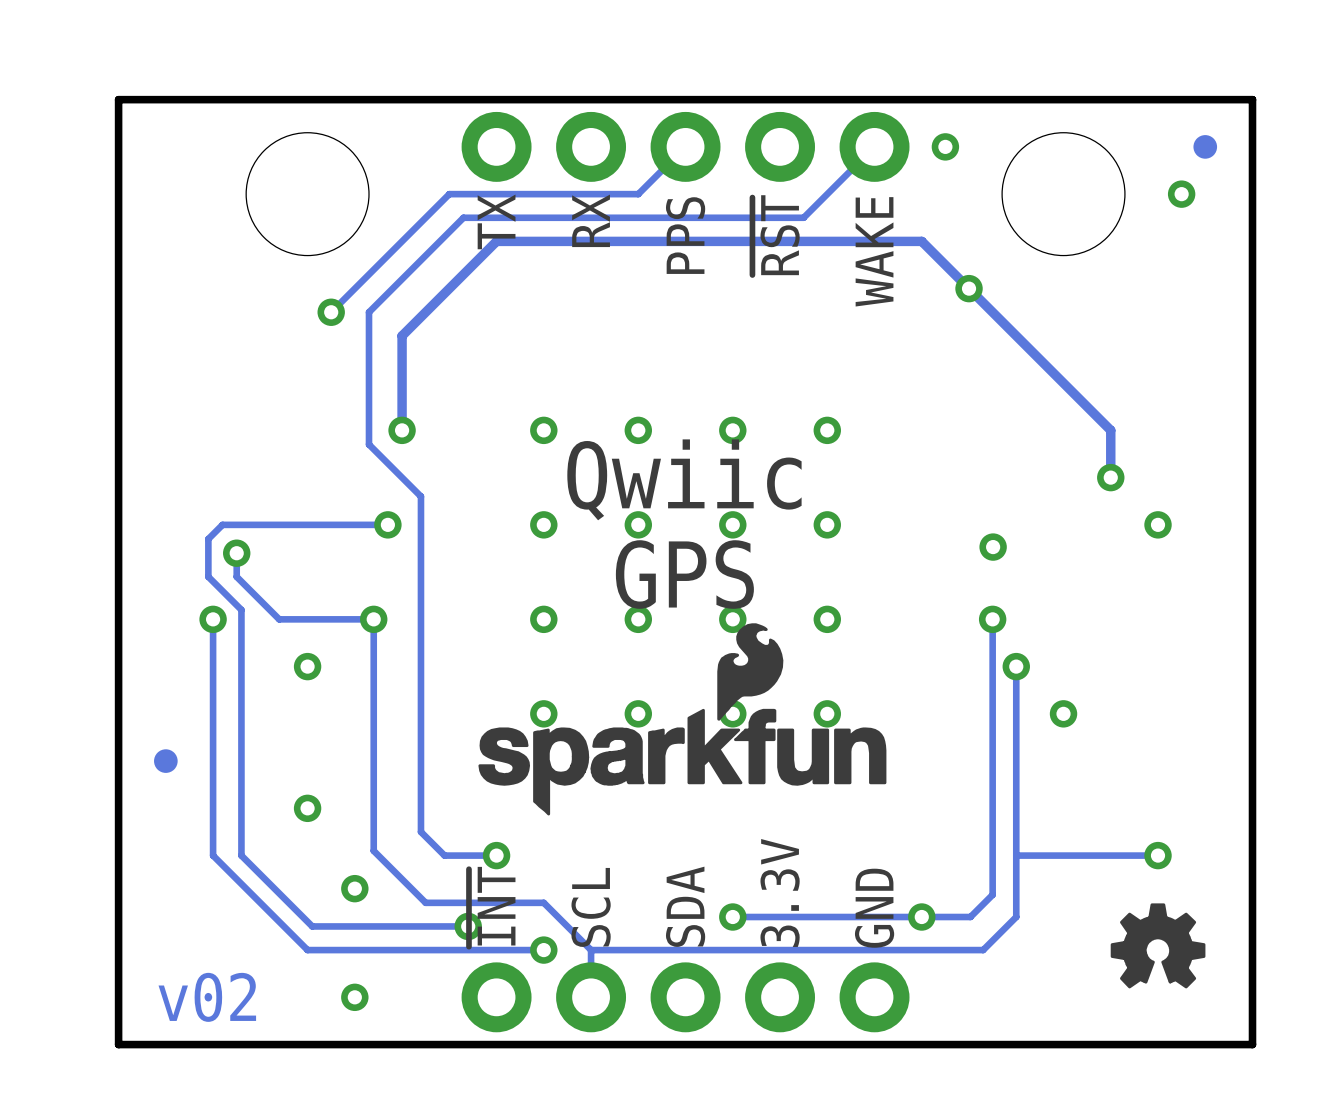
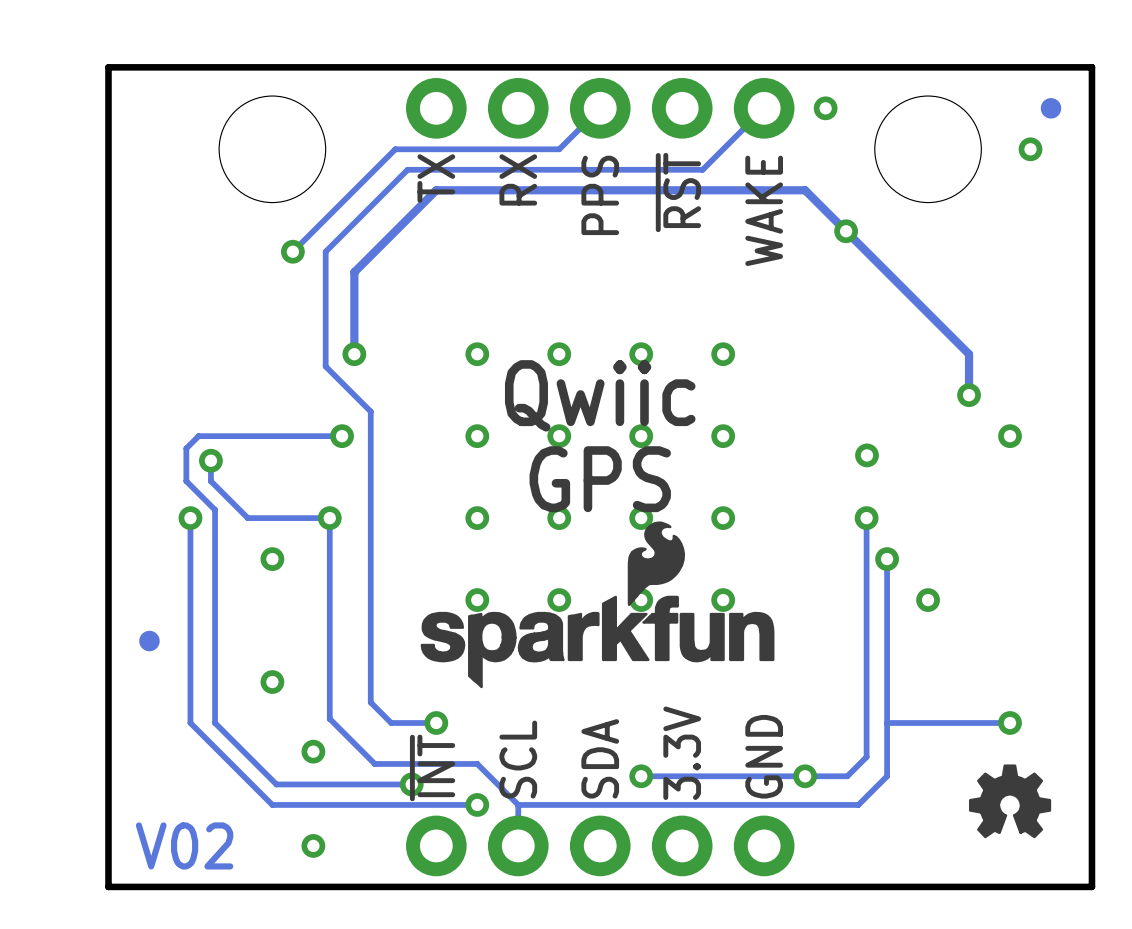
text: v02 (207, 997) -> V02 (184, 845)

